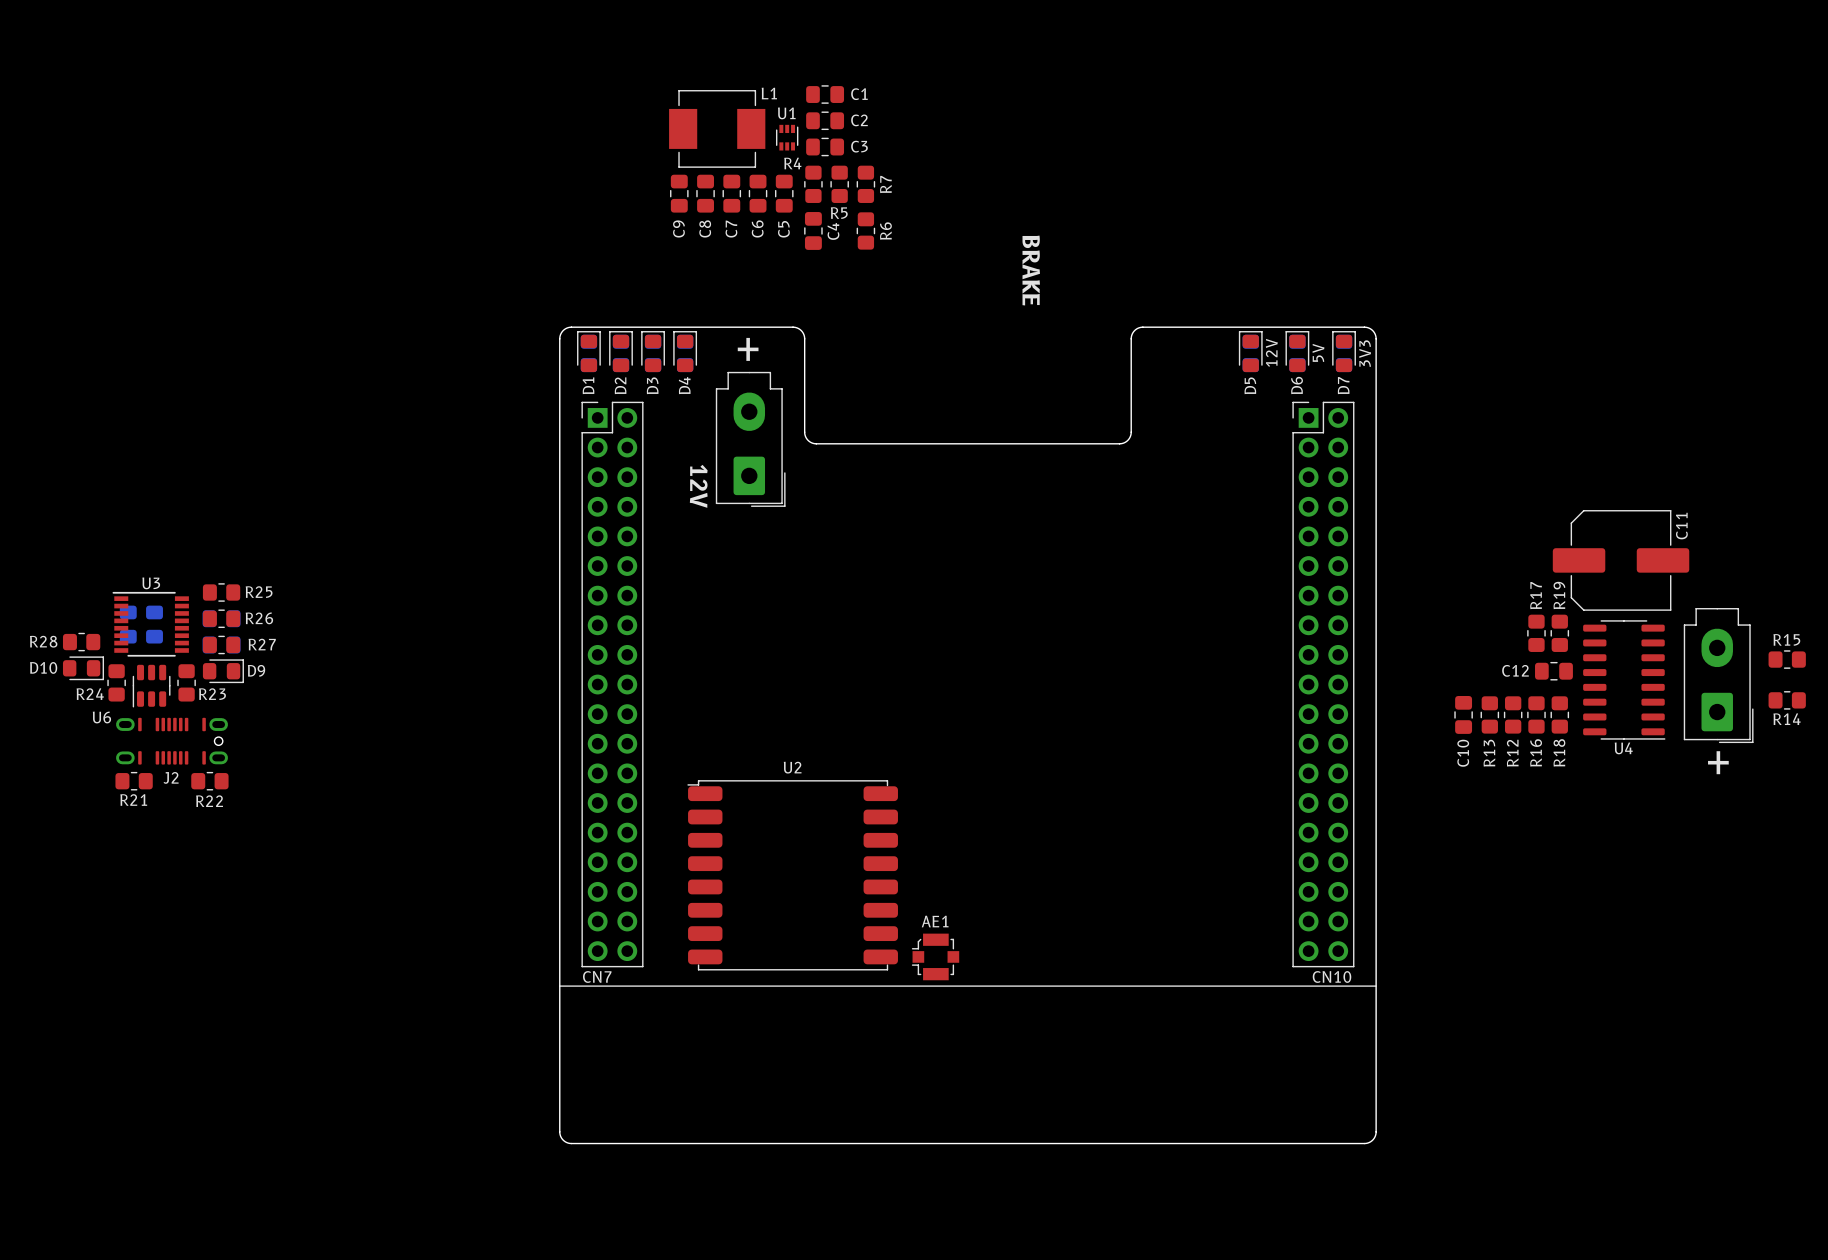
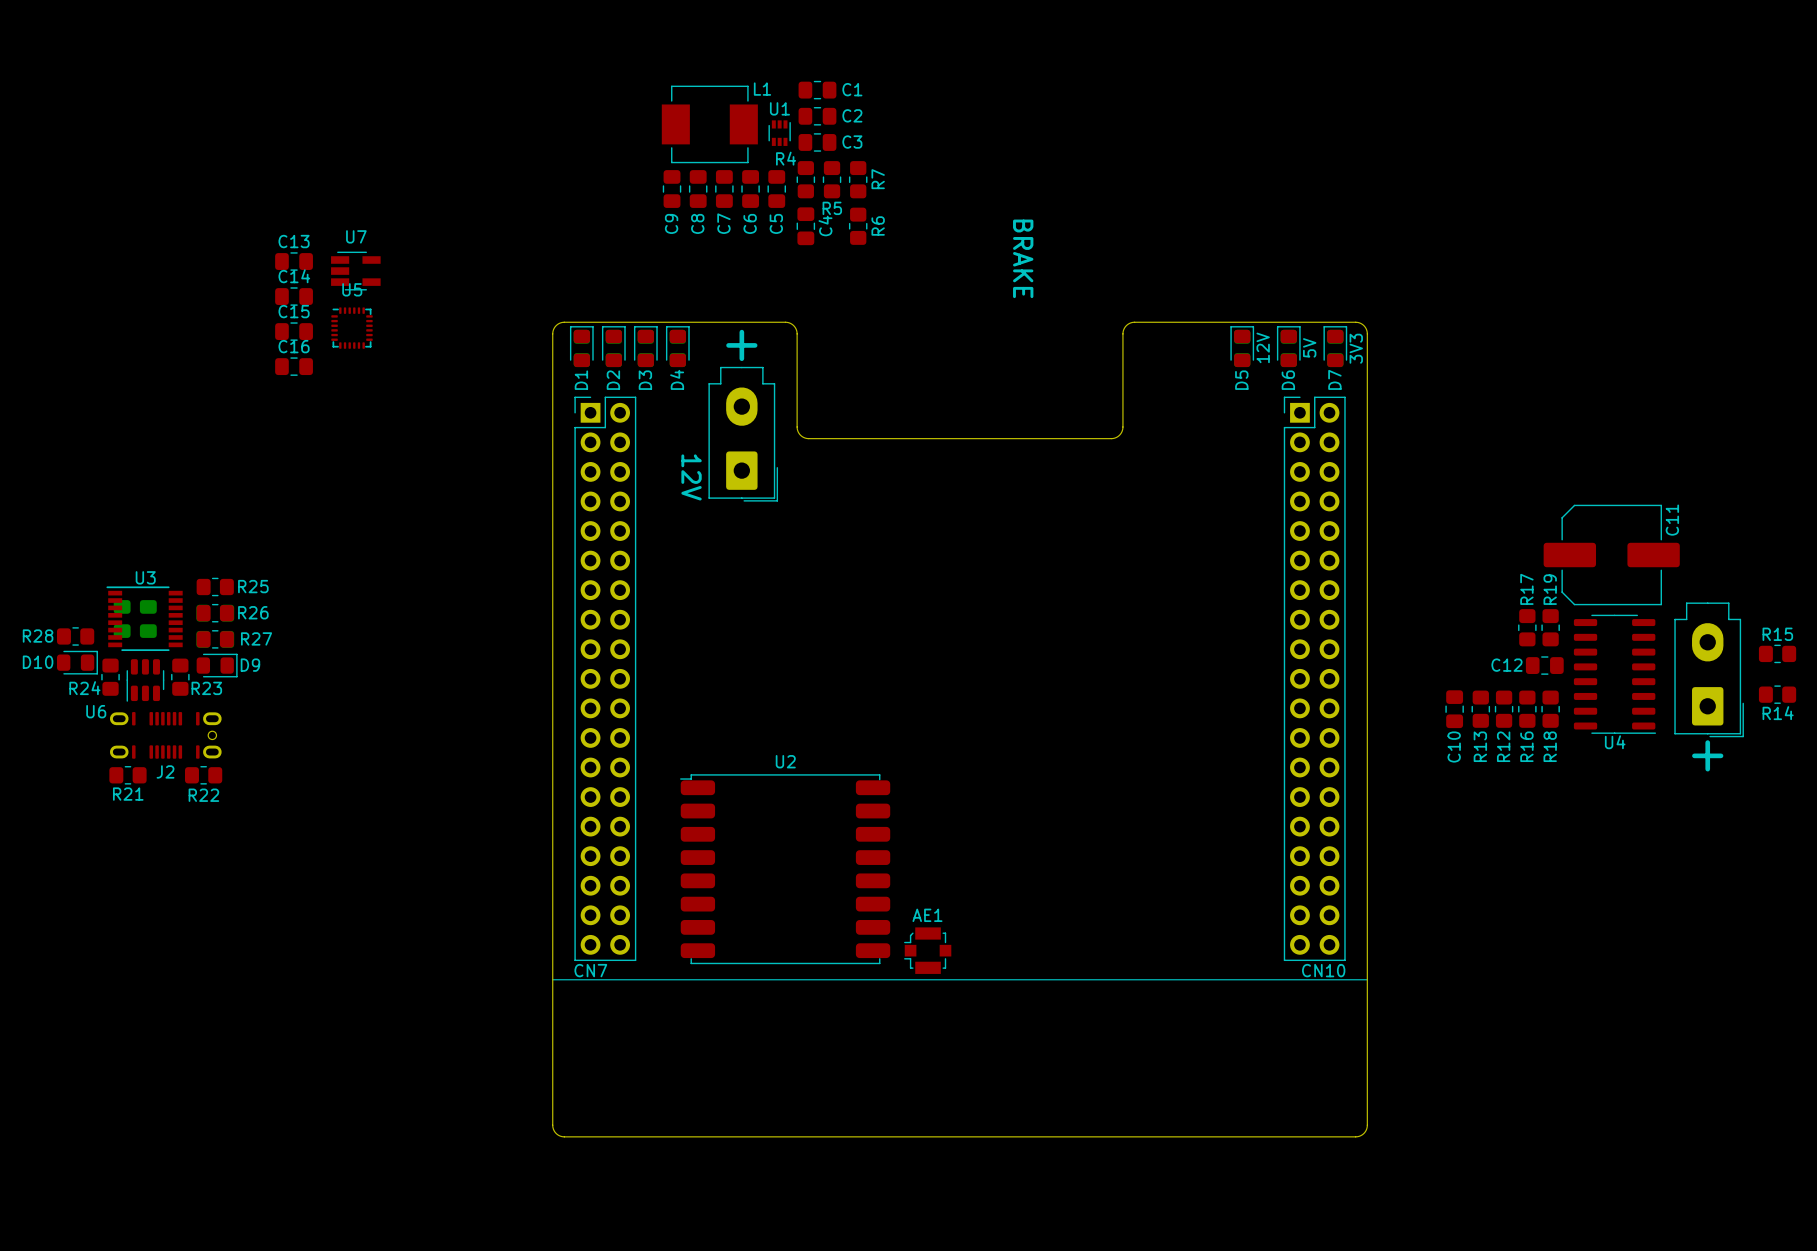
C13: none -> (294, 261)
U7: none -> (355, 271)
C14: none -> (294, 296)
U5: none -> (351, 328)
C15: none -> (294, 331)
C16: none -> (294, 366)

